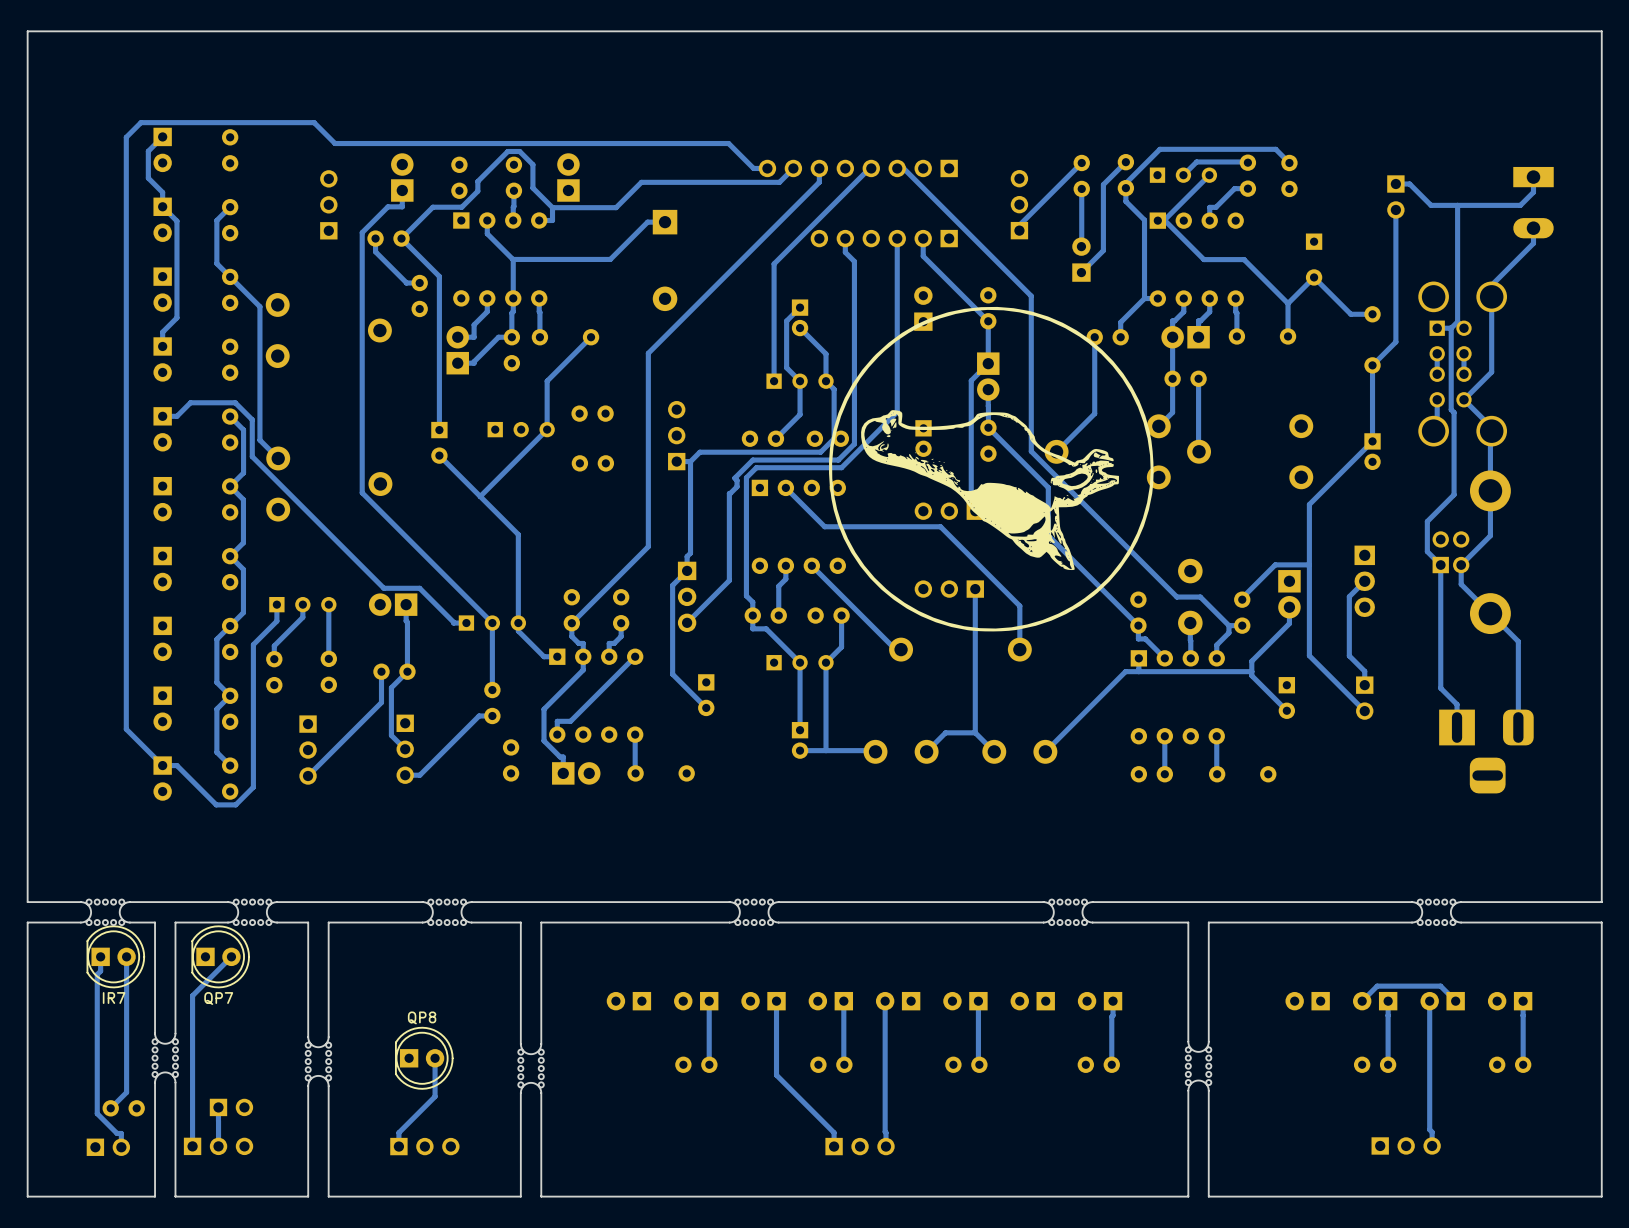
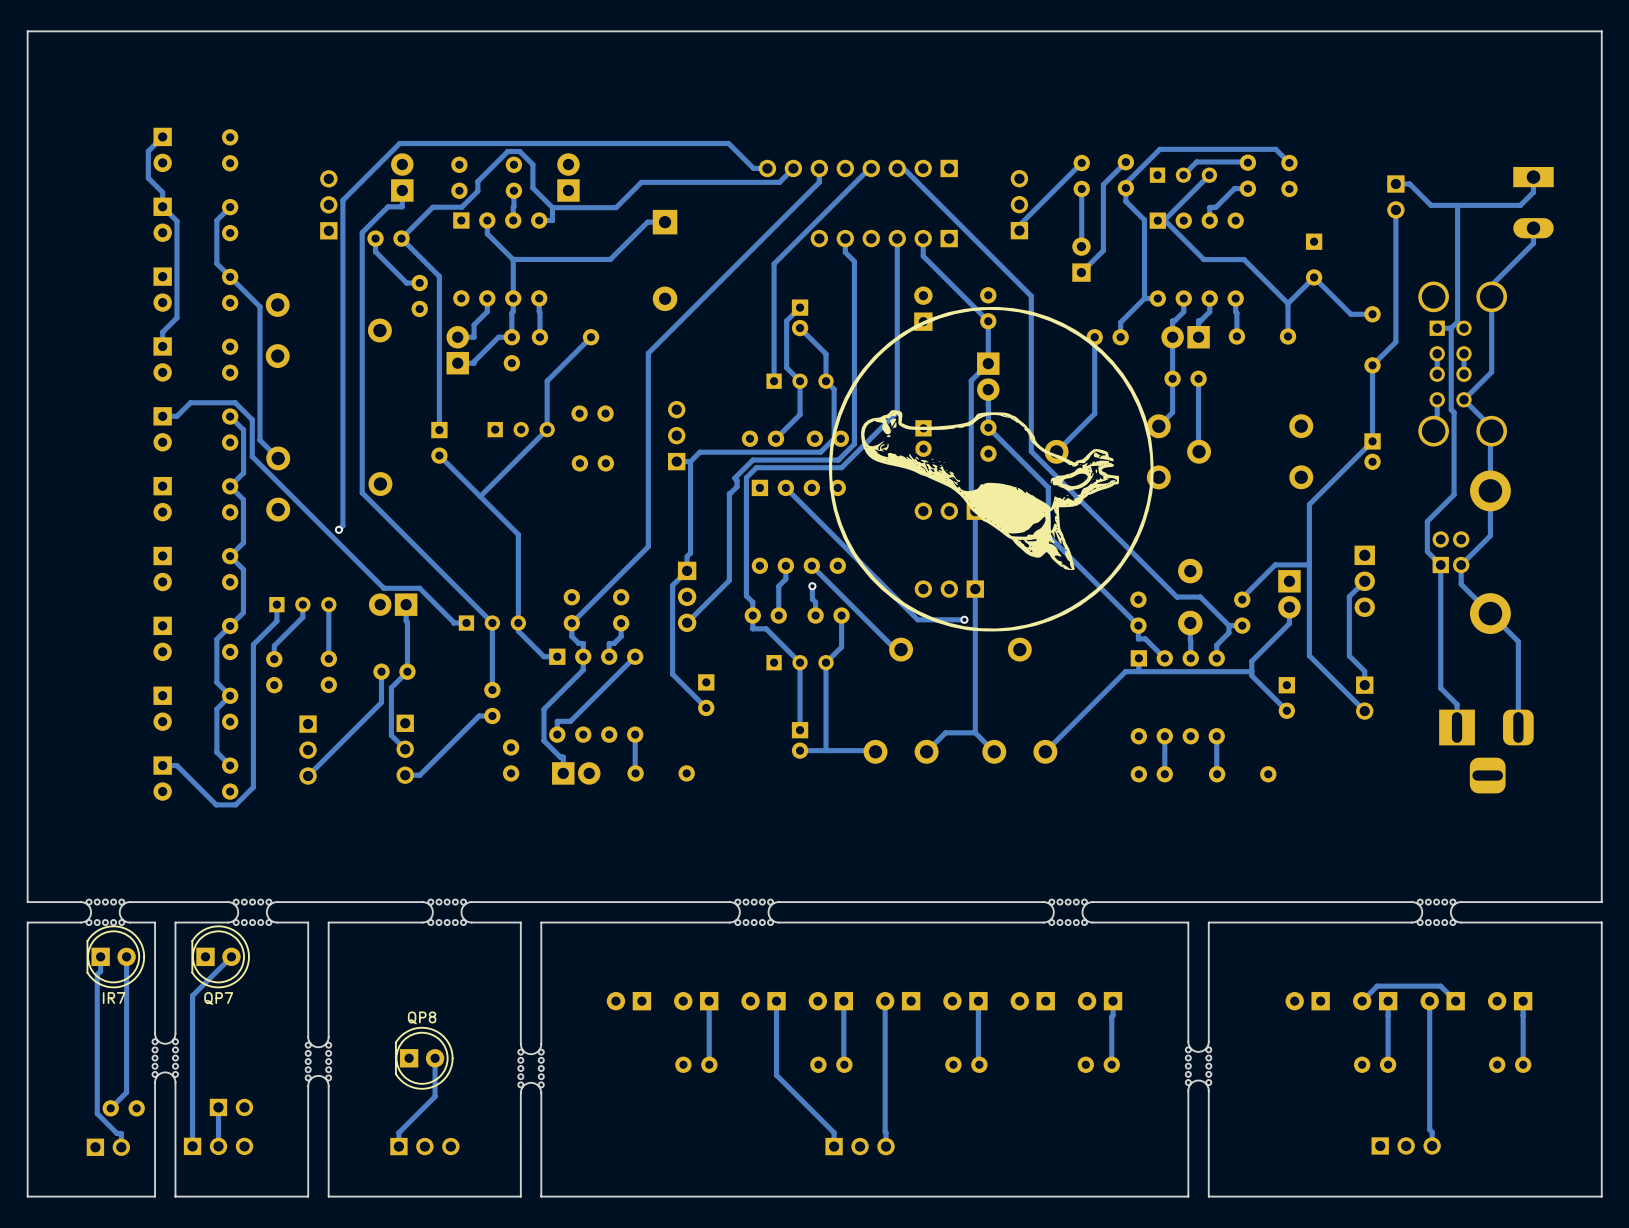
track: (399, 143) (335, 143) (314, 122) (141, 122) (126, 137) (126, 729) (162, 765) -> (399, 143) (342, 200) (342, 525) (338, 529)
track: none -> (975, 511) (975, 589)
track: (824, 526) (940, 526) (1019, 606) (1019, 649) -> (824, 526) (917, 619) (964, 619)
via: none -> (338, 529)
track: none -> (812, 586) (815, 615)
via: none -> (812, 586)
via: none -> (964, 619)

